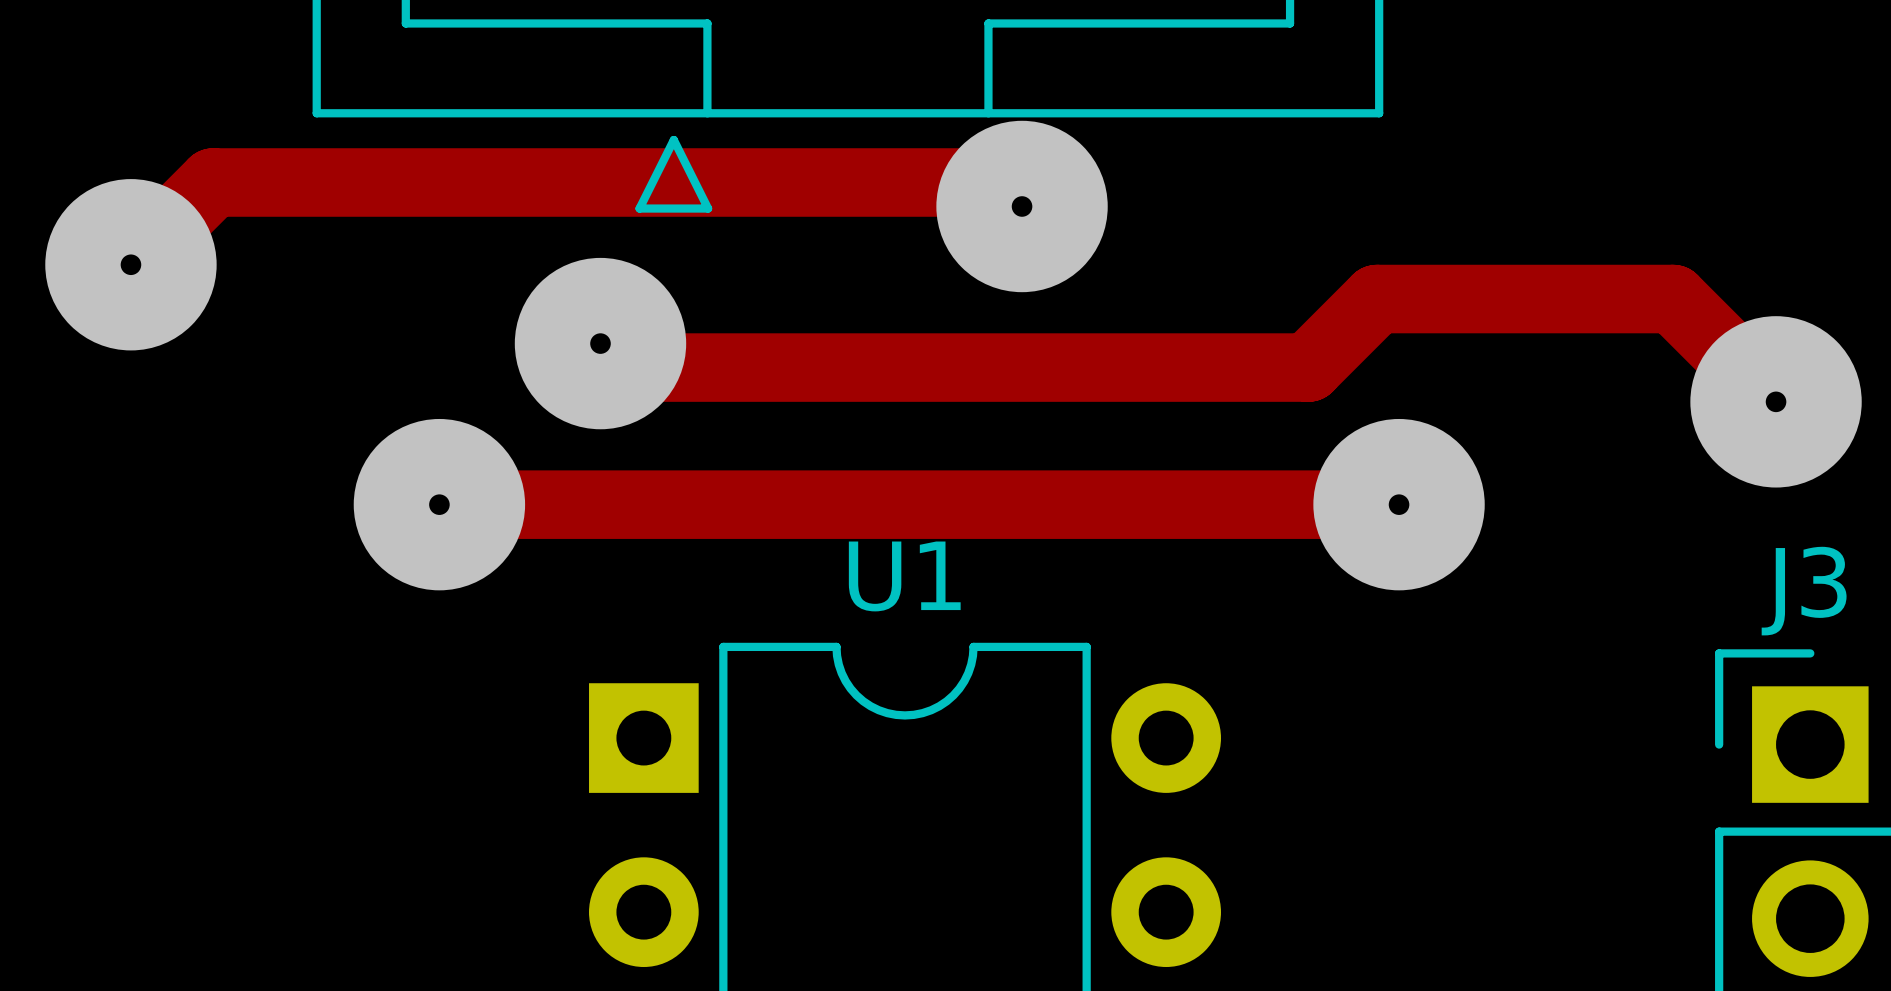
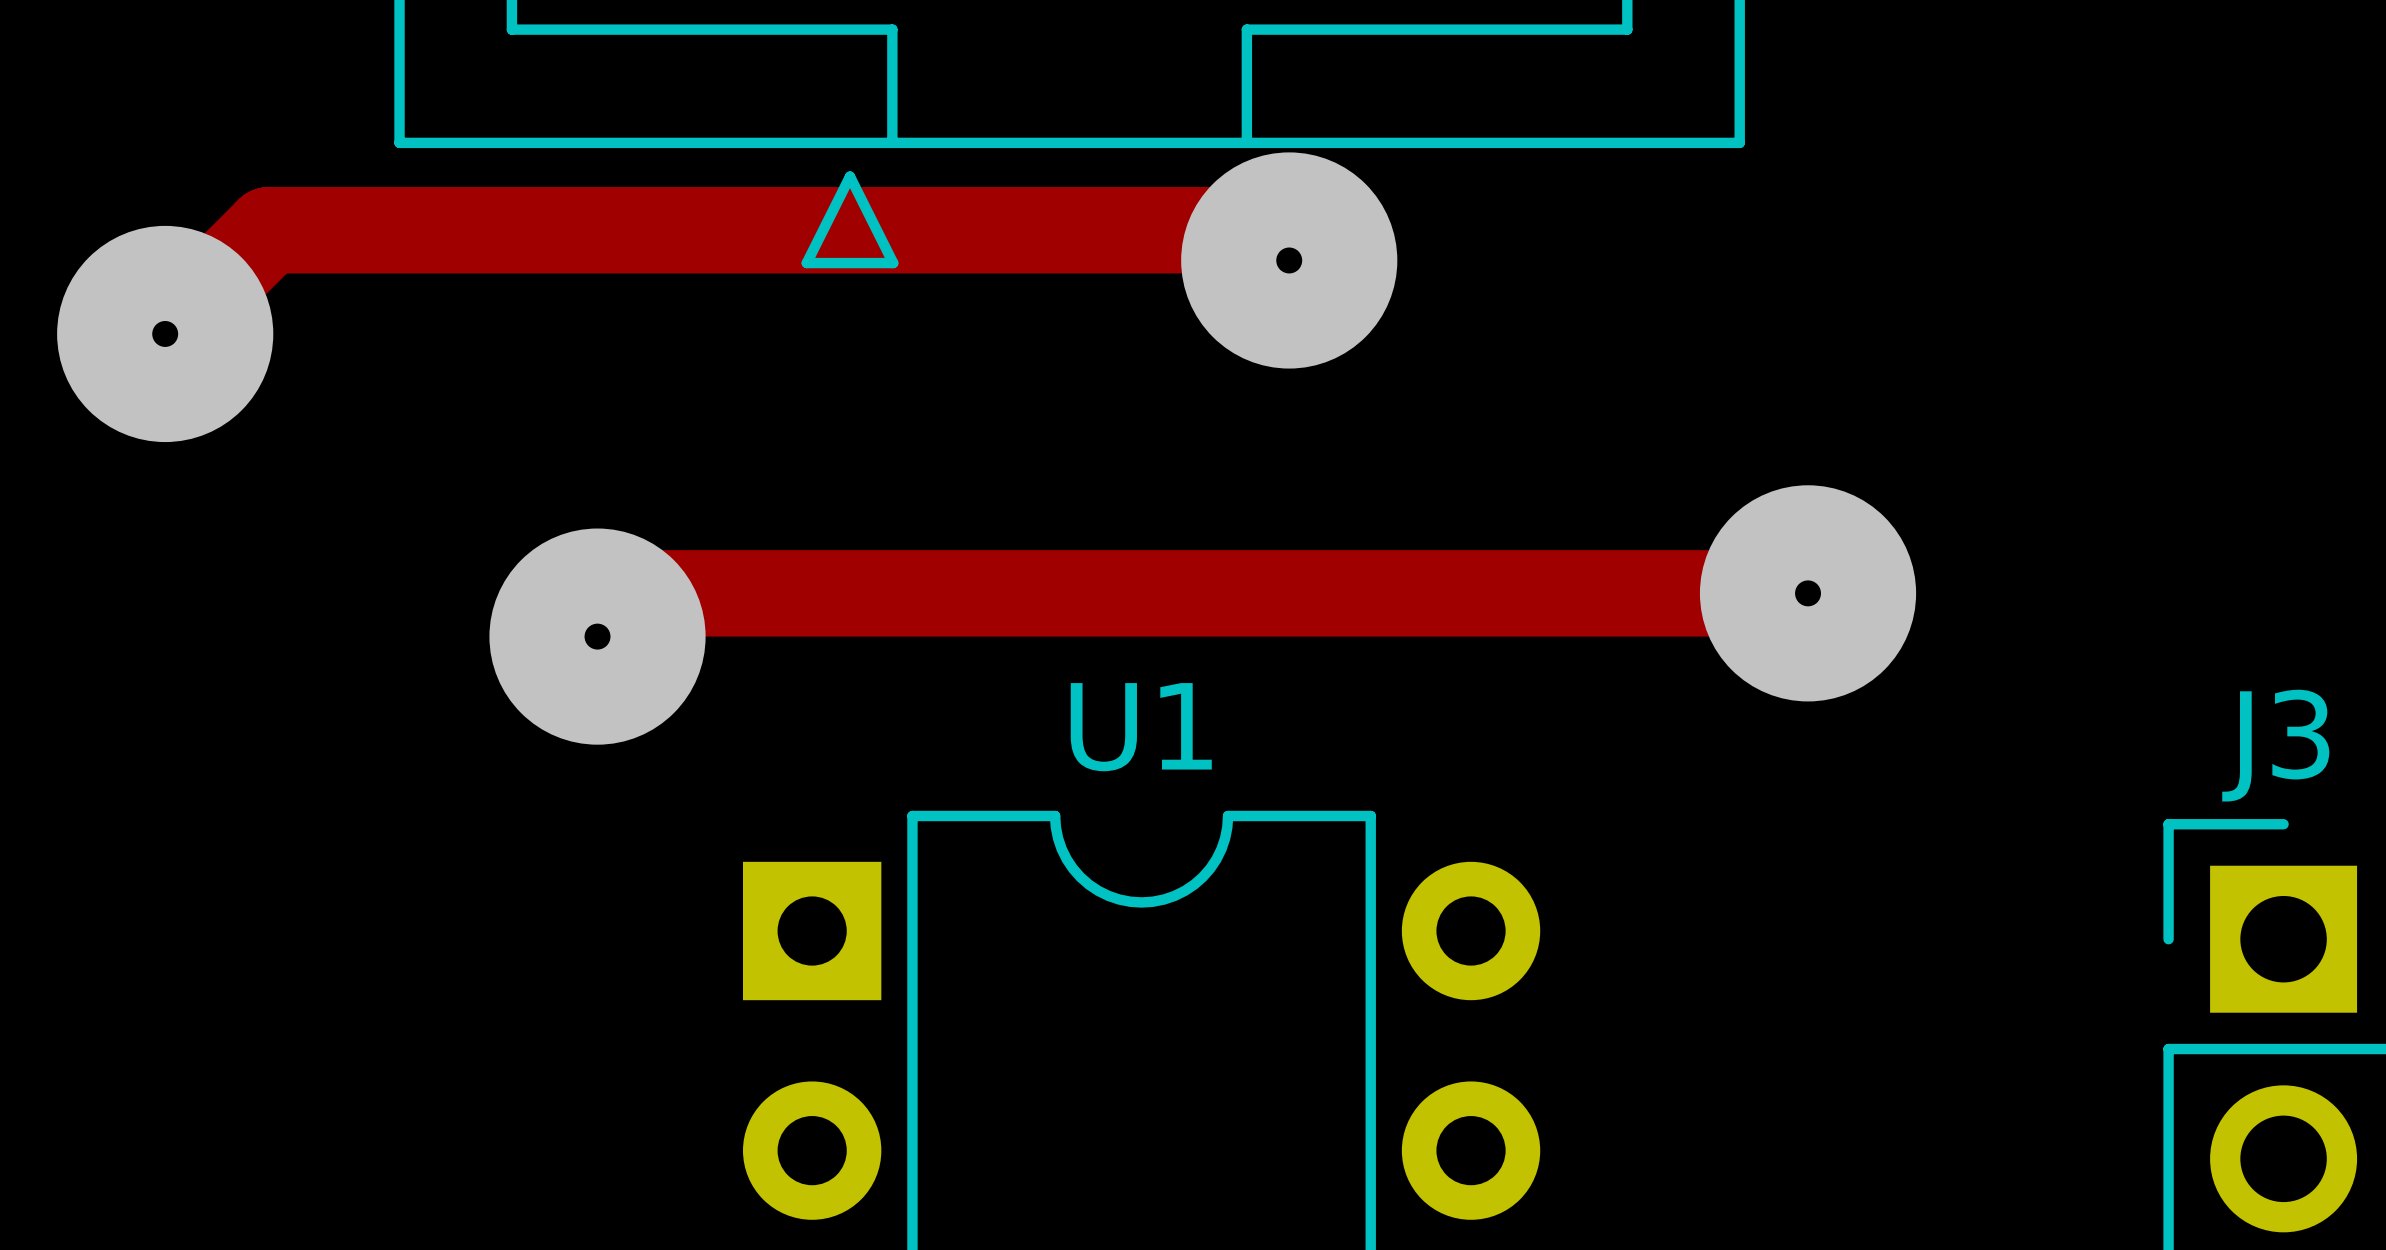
track: (600, 343) (624, 367) (1308, 367) (1376, 299) (1673, 299) (1776, 401) -> none
via: (600, 343) -> none
via: (1776, 401) -> none
track: none -> (1808, 593) (640, 593) (597, 636)
track: (439, 504) (1399, 504) -> none
via position: (439, 504) -> (597, 636)
via position: (1399, 504) -> (1808, 593)

